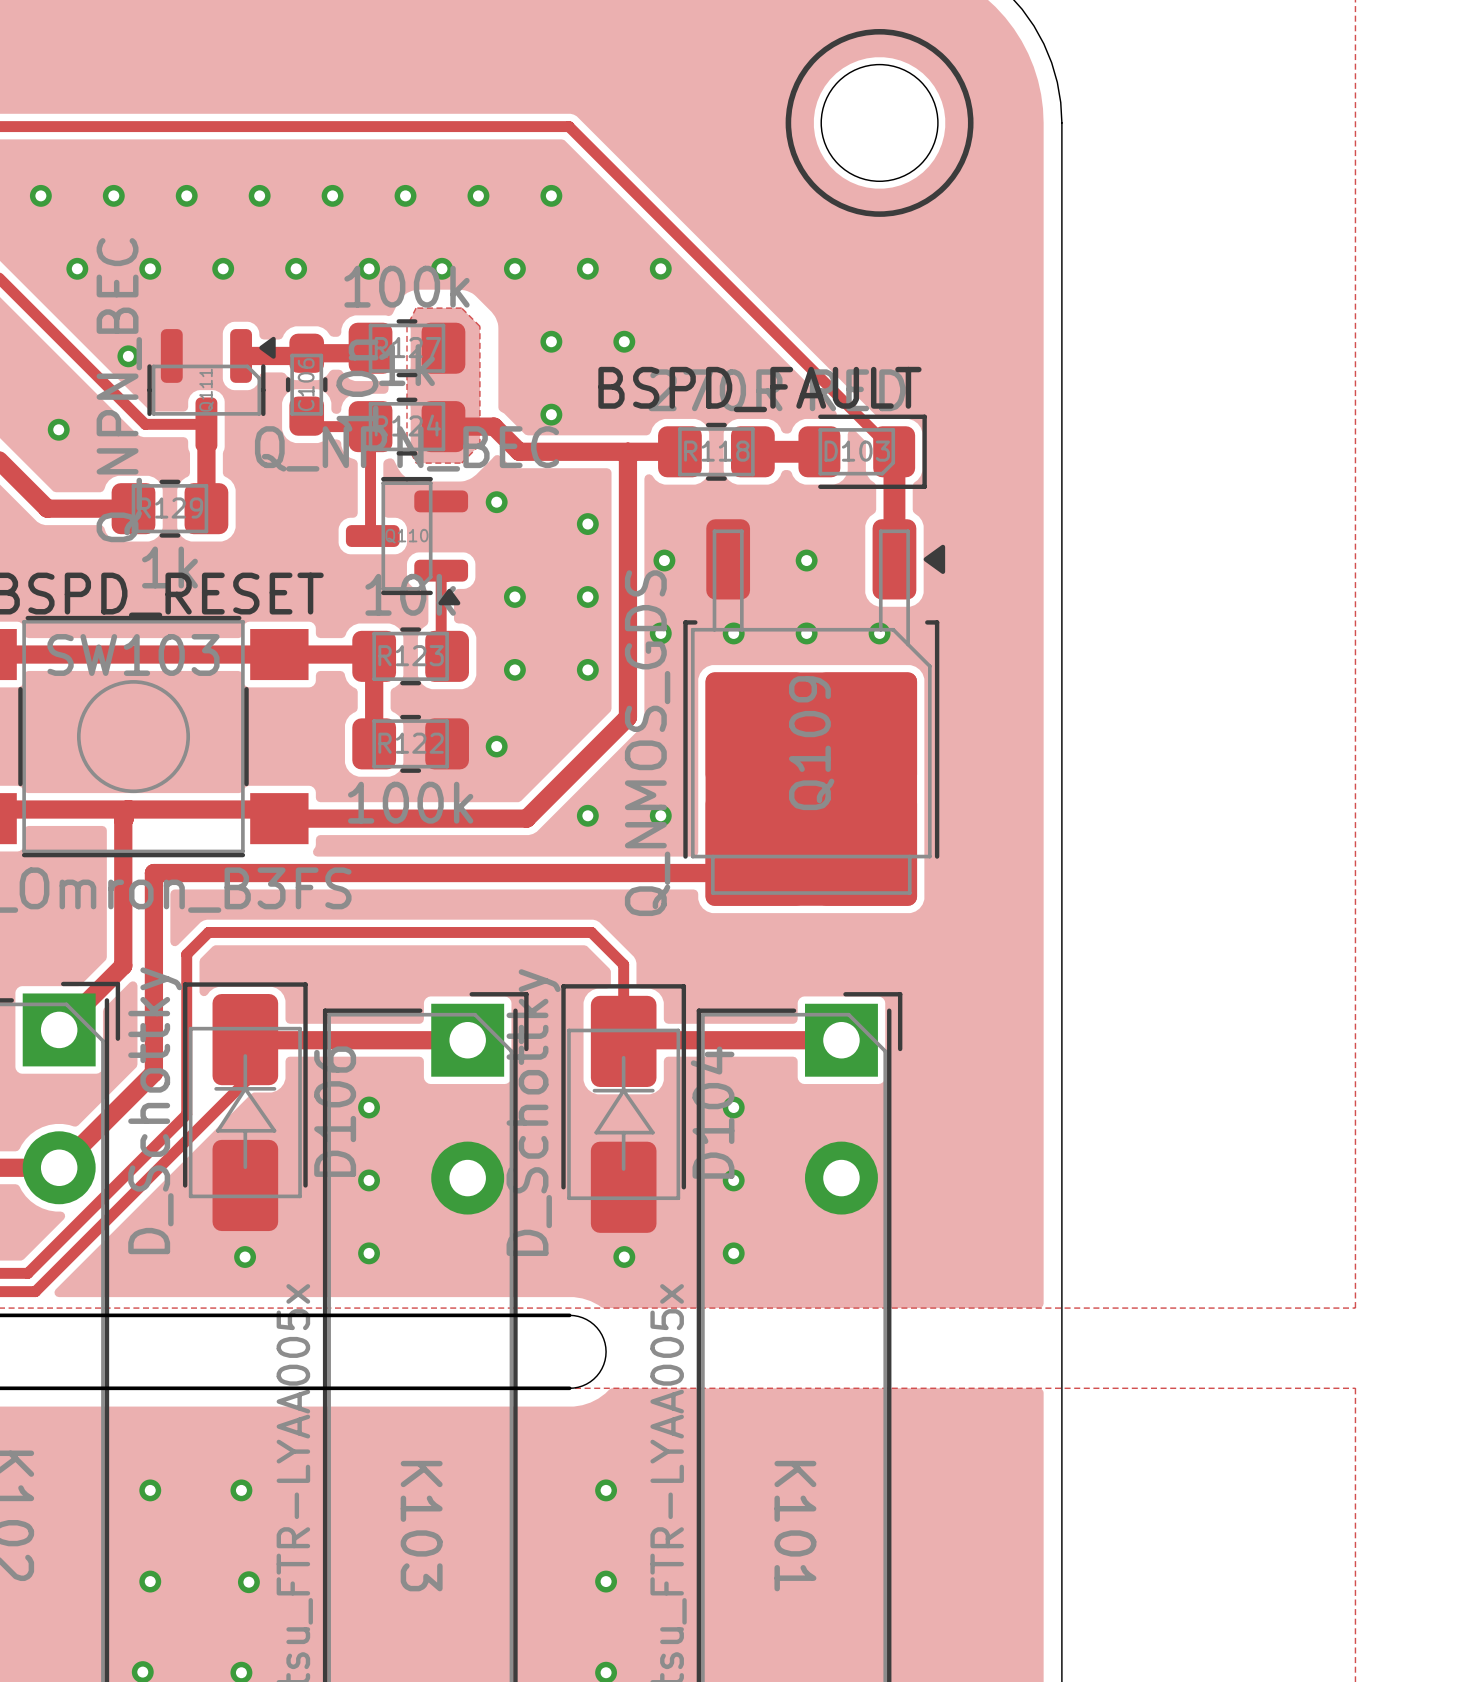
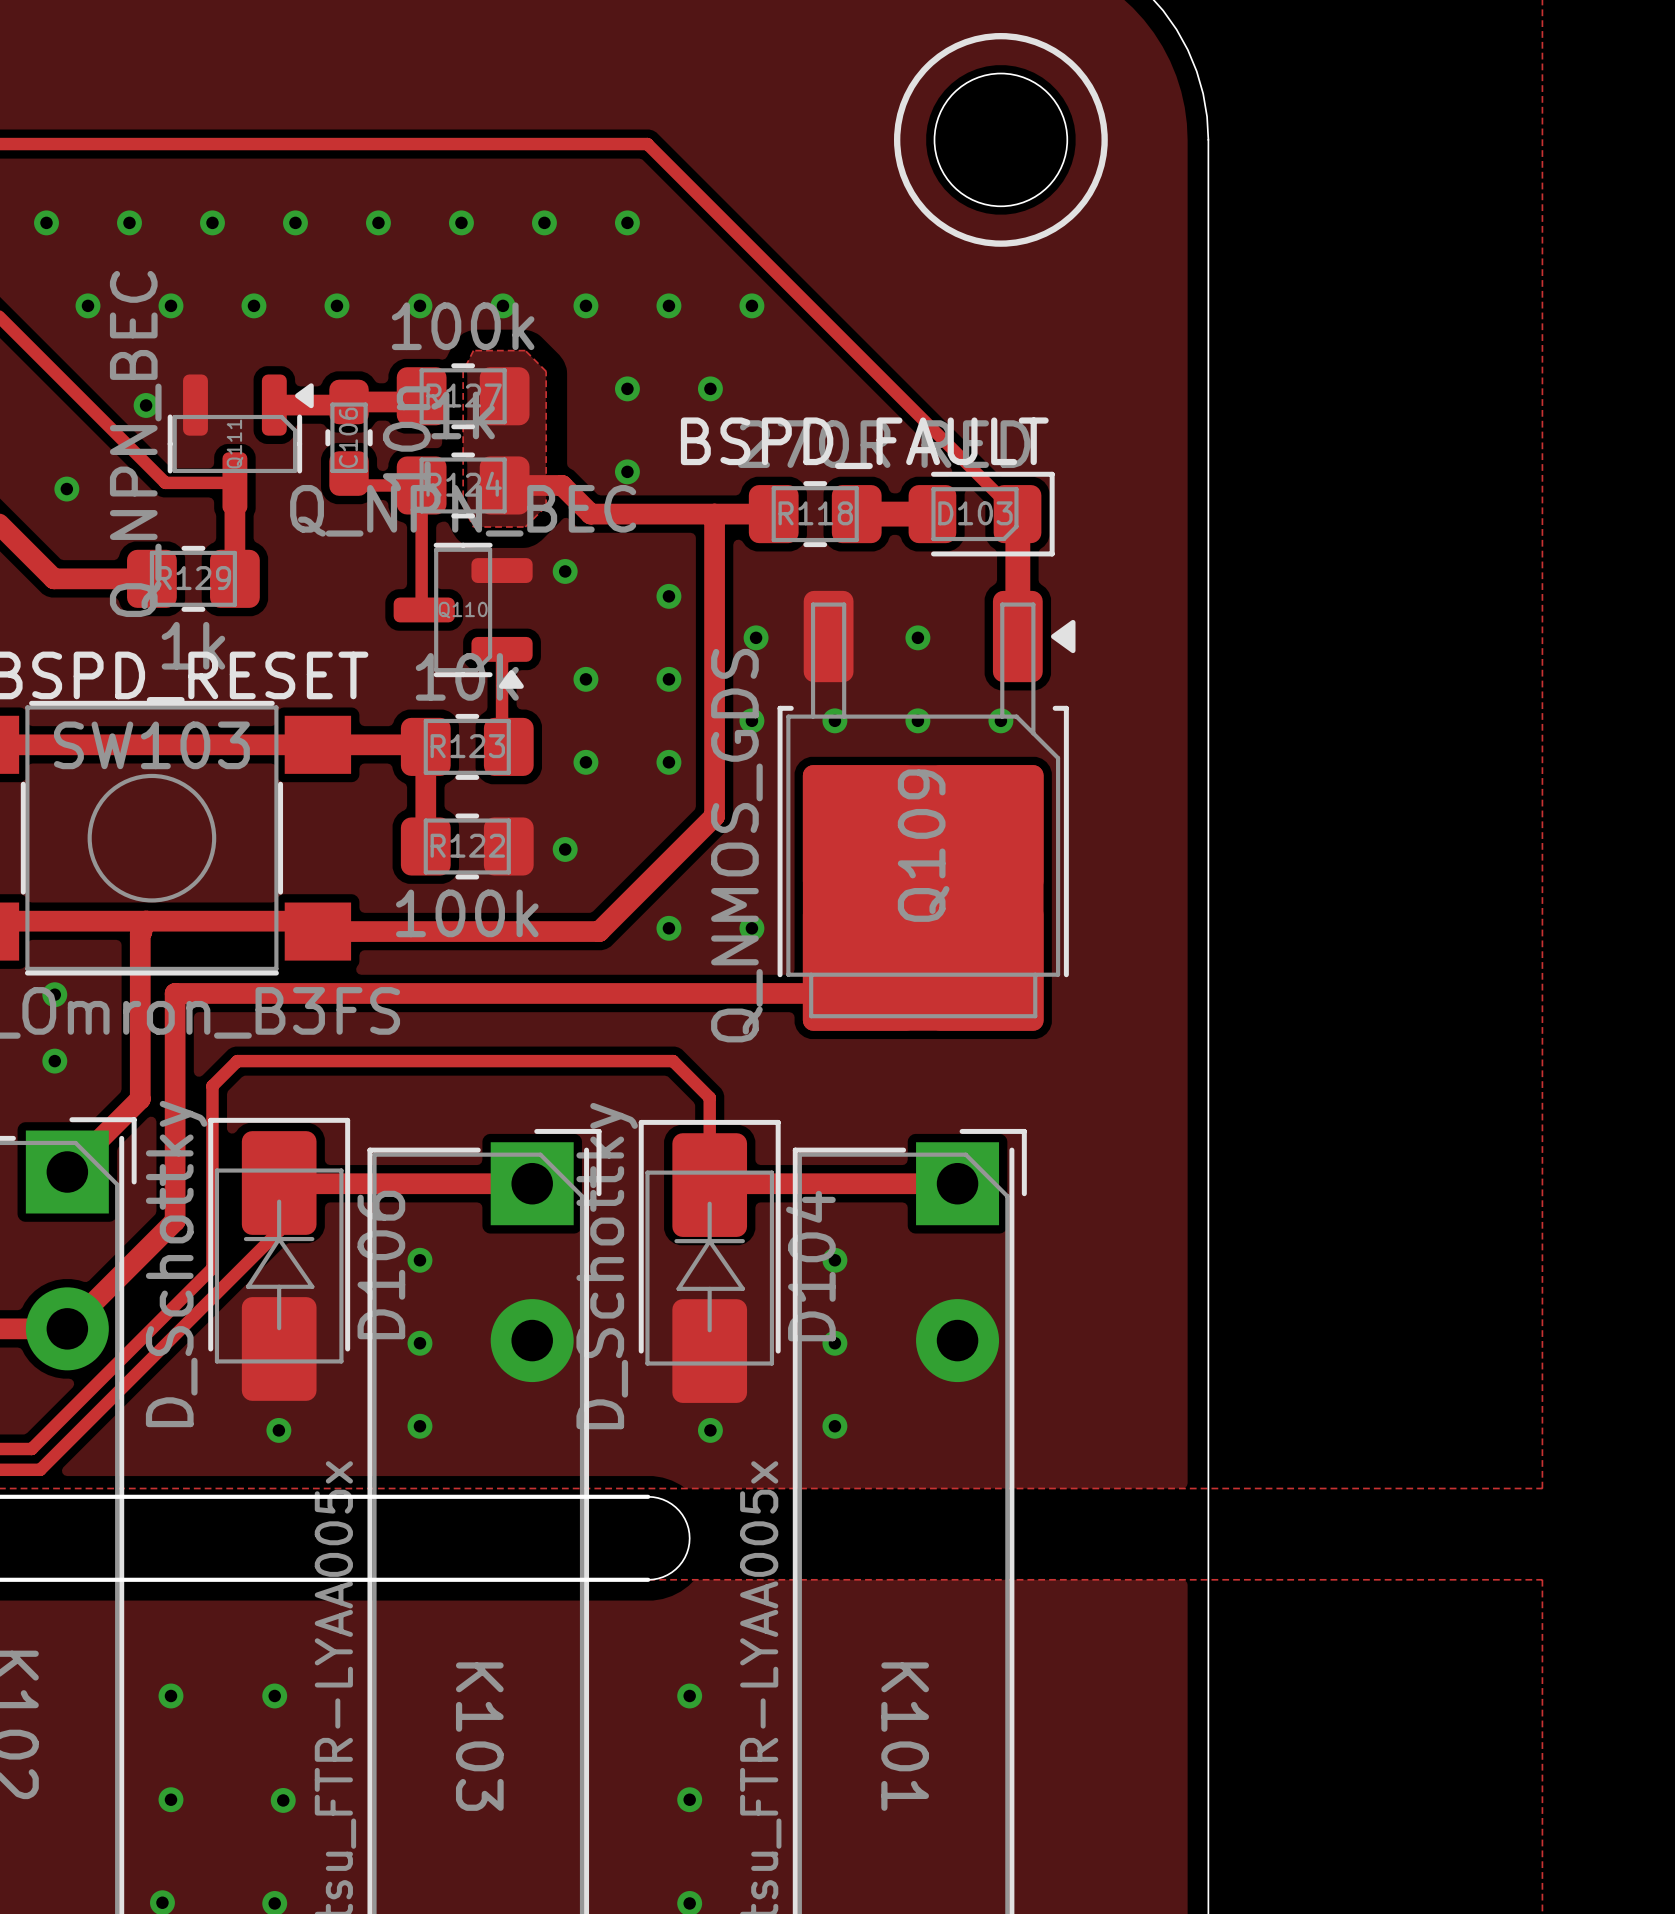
via: none -> (54, 994)
via: none -> (54, 1061)

